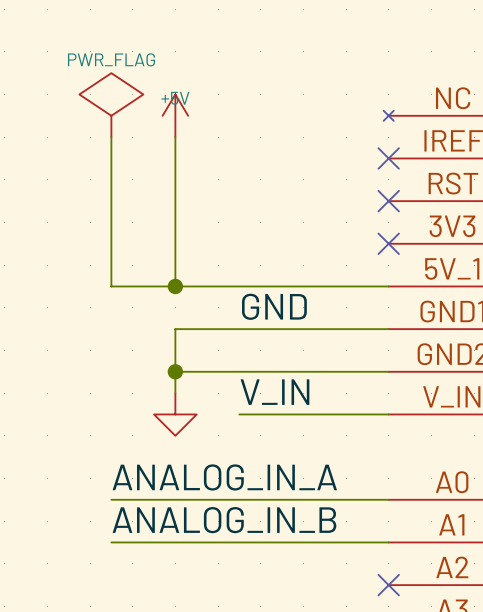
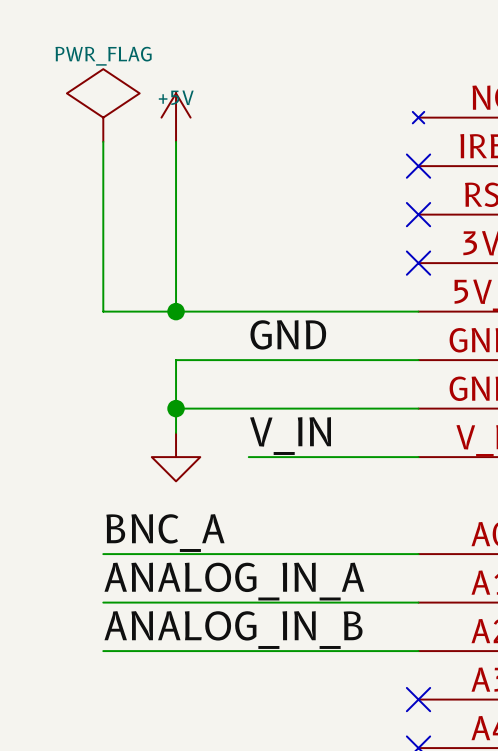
label: ANALOG_IN_A (224, 477) -> BNC_A (165, 533)
label: ANALOG_IN_B (224, 520) -> ANALOG_IN_A (234, 581)
label: none -> ANALOG_IN_B (233, 630)
wire: none -> (103, 651) (418, 651)
no-connect mark: (388, 585) -> none

